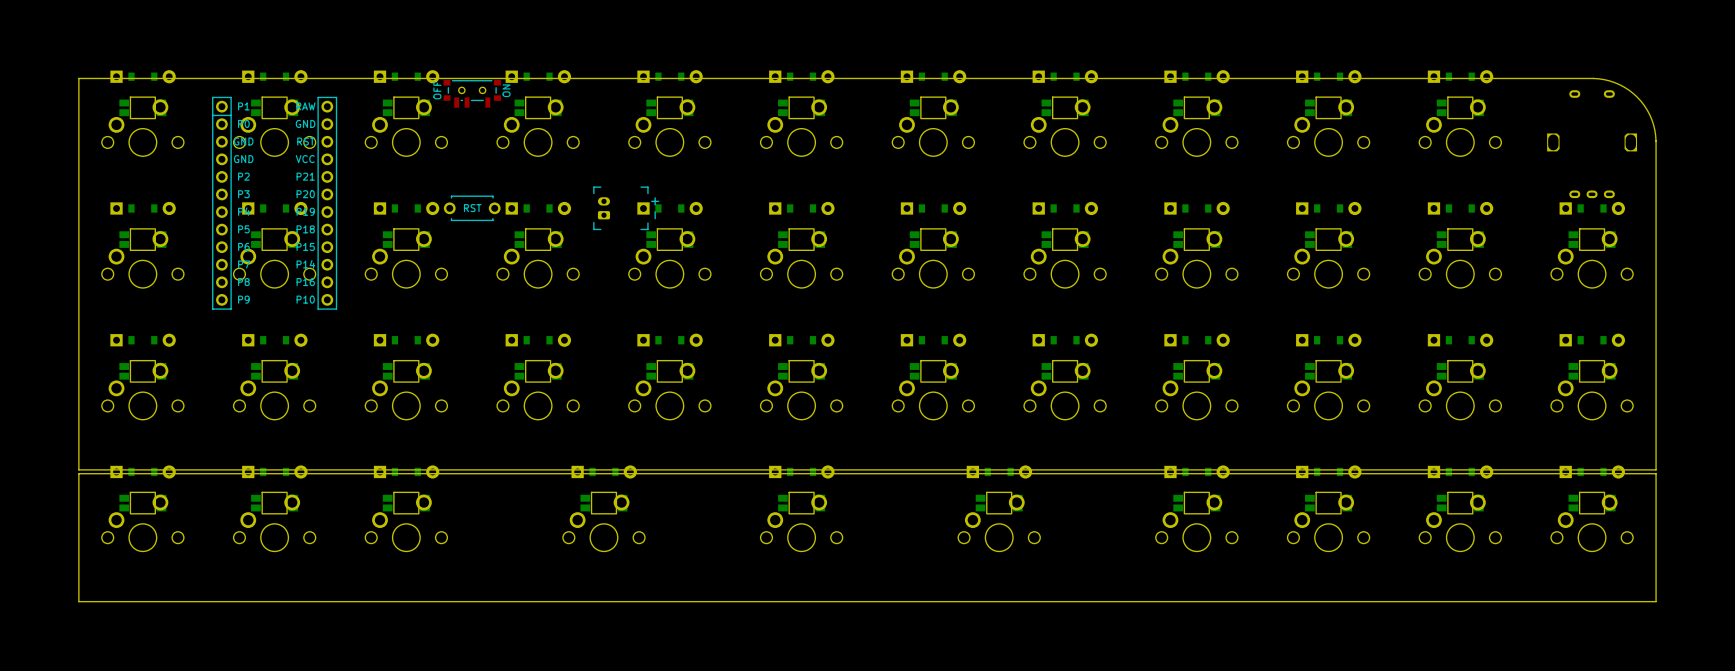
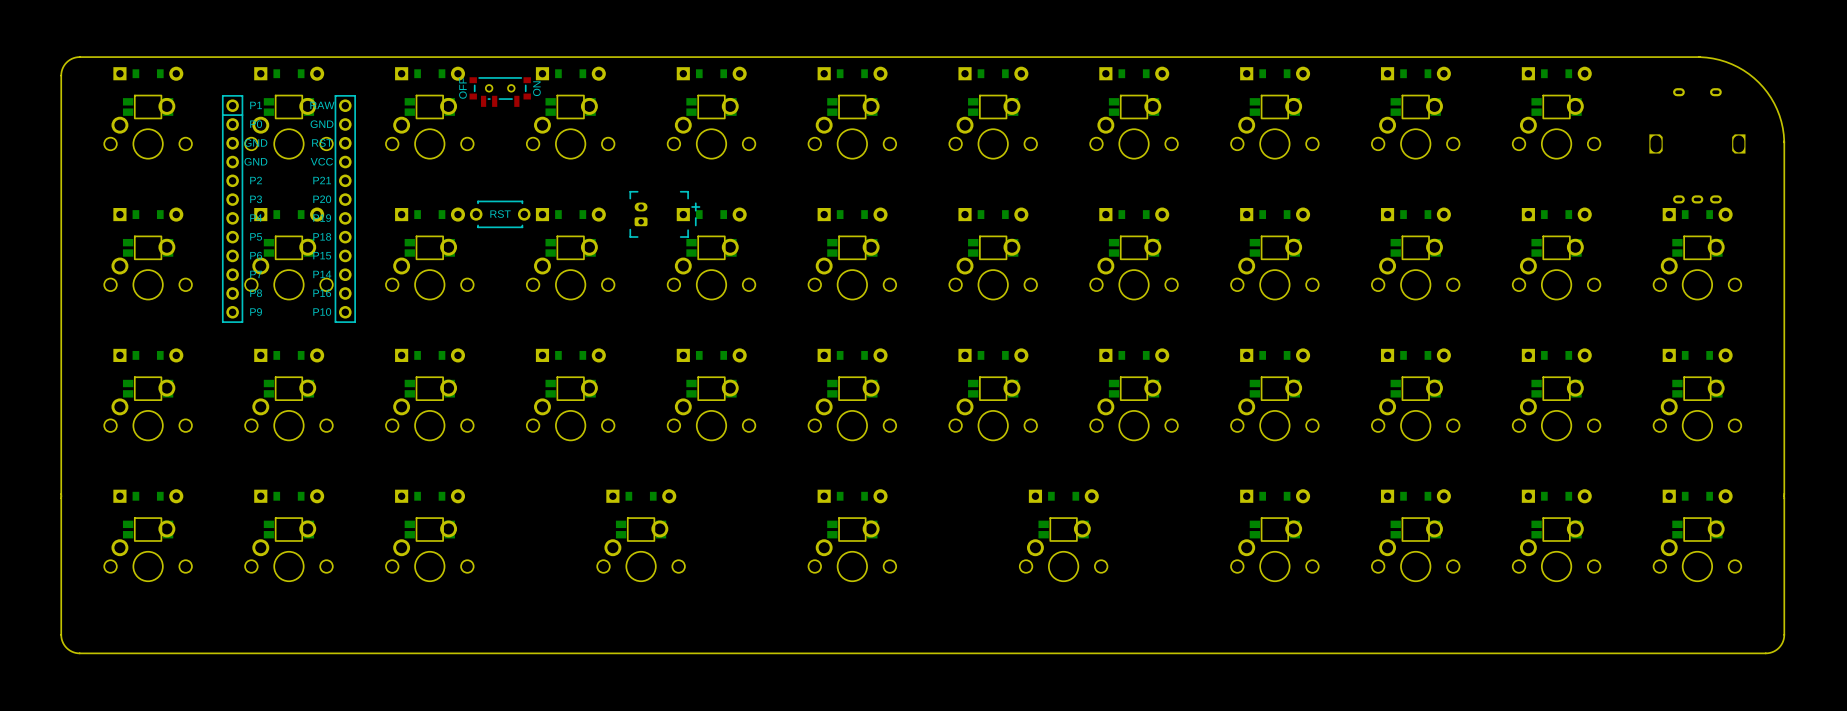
board edge: (78, 78) (1593, 78) (1609, 80) (1629, 90) (1640, 101) (1651, 119) (1655, 135) (1656, 469) (78, 469) (78, 78) -> none
board edge: none -> (61, 496) (61, 636) (66, 647) (79, 653) (1767, 653) (1778, 647) (1784, 636) (1784, 496)
board edge: none -> (61, 496) (61, 75) (66, 62) (79, 57) (1698, 57) (1719, 59) (1743, 70) (1758, 82) (1774, 103) (1782, 128) (1784, 496)
board edge: (78, 473) (78, 601) (1656, 601) (1656, 473) (78, 473) -> none

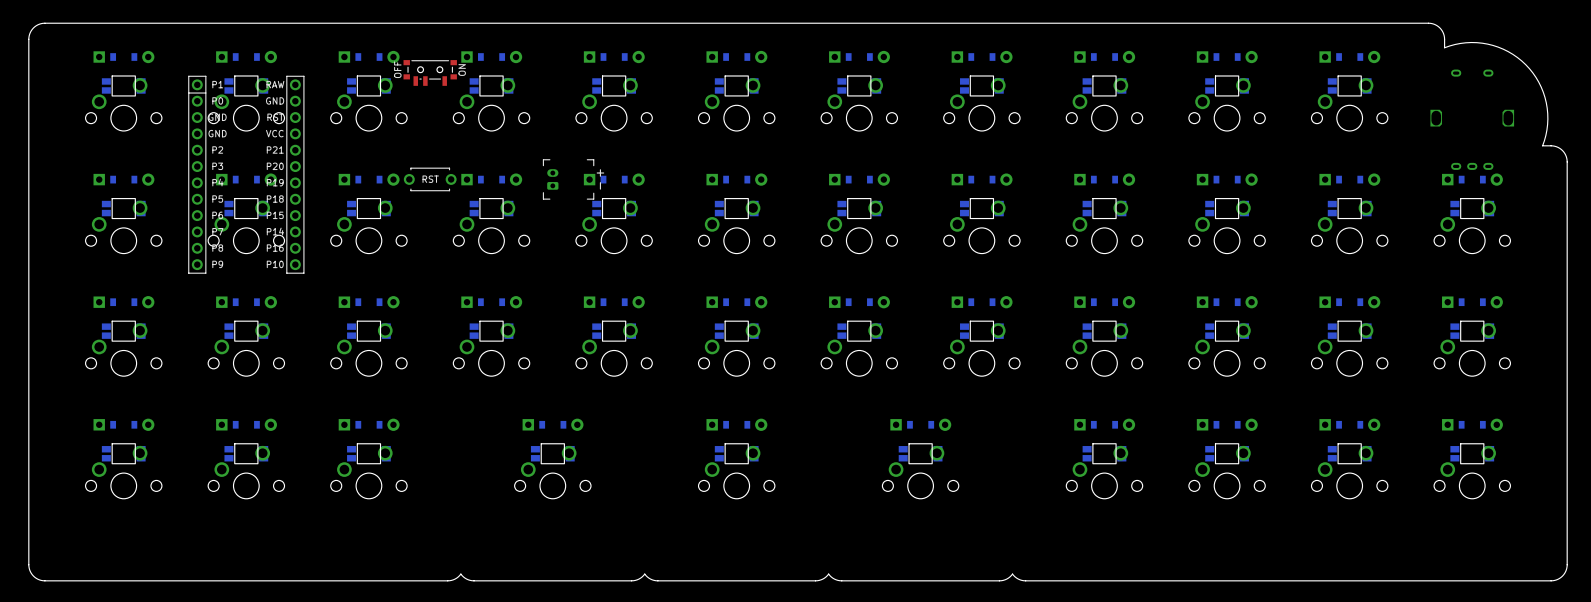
board edge: none -> (44, 23) (1428, 23) (1435, 24) (1442, 30) (1444, 47) (1471, 42) (1498, 47) (1517, 57) (1536, 77) (1543, 92) (1547, 108) (1546, 129) (1542, 145) (1559, 148) (1564, 153) (1567, 160) (1566, 570) (1561, 577) (1551, 580) (1025, 580) (1018, 579) (1012, 574) (1006, 579) (999, 580) (841, 580) (834, 579) (828, 574) (822, 579) (815, 580) (657, 580) (650, 579) (644, 574) (639, 579) (631, 580) (473, 580) (466, 579) (460, 574) (455, 579) (447, 580) (39, 579) (32, 574) (28, 564) (28, 39) (33, 27) (44, 23)
board edge: (61, 496) (61, 636) (66, 647) (79, 653) (1767, 653) (1778, 647) (1784, 636) (1784, 496) -> none
board edge: (61, 496) (61, 75) (66, 62) (79, 57) (1698, 57) (1719, 59) (1743, 70) (1758, 82) (1774, 103) (1782, 128) (1784, 496) -> none

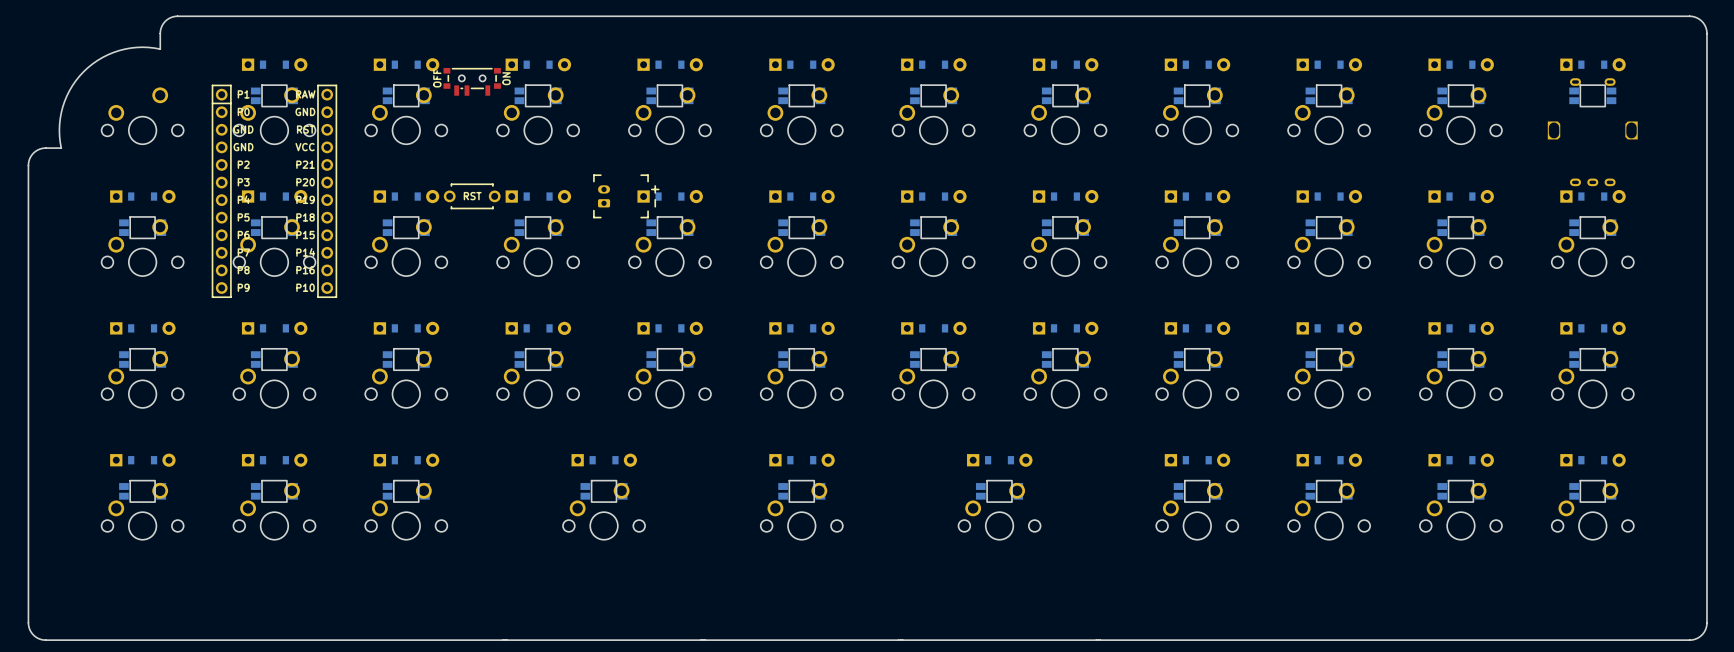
board edge: (44, 23) (1428, 23) (1435, 24) (1442, 30) (1444, 47) (1471, 42) (1498, 47) (1517, 57) (1536, 77) (1543, 92) (1547, 108) (1546, 129) (1542, 145) (1559, 148) (1564, 153) (1567, 160) (1566, 570) (1561, 577) (1551, 580) (1025, 580) (1018, 579) (1012, 574) (1006, 579) (999, 580) (841, 580) (834, 579) (828, 574) (822, 579) (815, 580) (657, 580) (650, 579) (644, 574) (639, 579) (631, 580) (473, 580) (466, 579) (460, 574) (455, 579) (447, 580) (39, 579) (32, 574) (28, 564) (28, 39) (33, 27) (44, 23) -> (177, 16) (168, 18) (161, 26) (160, 49) (142, 47) (119, 50) (102, 57) (83, 71) (69, 90) (62, 106) (59, 130) (61, 148) (38, 149) (32, 154) (28, 161) (28, 622) (31, 632) (40, 639) (1689, 640) (1698, 637) (1706, 628) (1706, 33) (1704, 24) (1695, 17) (177, 16)
part: (123, 57) -> none
part: none -> (1593, 64)
part: (123, 85) -> none
part: none -> (1592, 95)

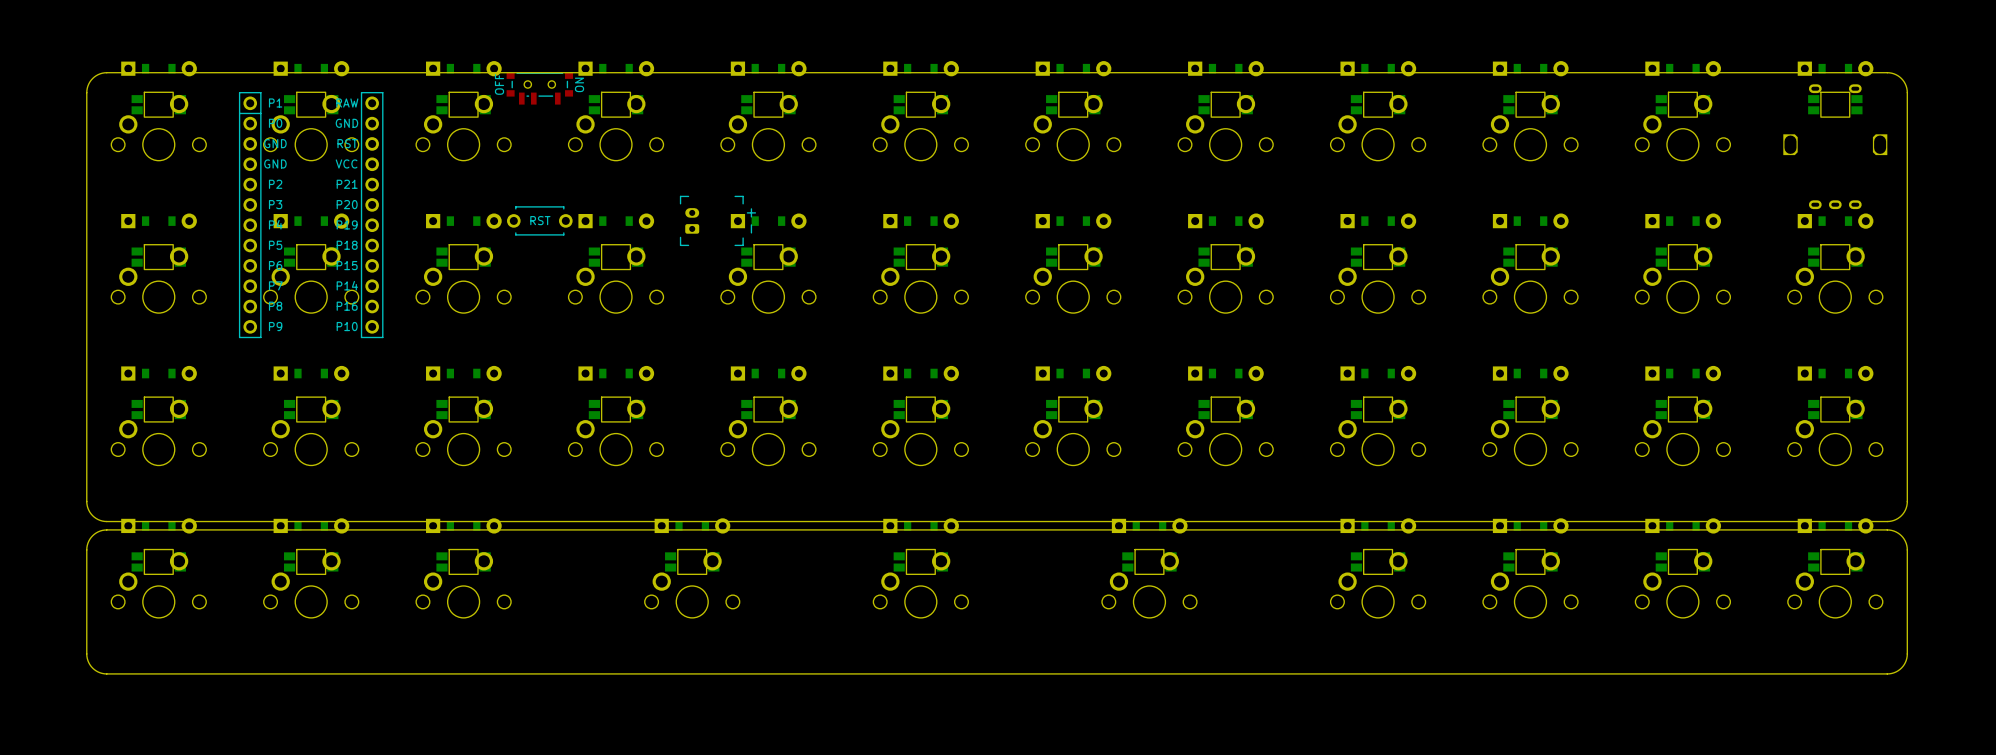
board edge: (177, 16) (1695, 17) (1704, 24) (1706, 33) (1706, 628) (1698, 637) (1689, 640) (40, 639) (31, 632) (28, 622) (28, 161) (32, 154) (38, 149) (61, 148) (59, 130) (62, 106) (69, 90) (83, 71) (102, 57) (119, 50) (142, 47) (160, 49) (161, 26) (168, 18) (177, 16) -> (106, 72) (92, 78) (86, 92) (86, 501) (91, 514) (102, 521) (1887, 521) (1899, 517) (1906, 505) (1907, 92) (1902, 80) (1891, 73) (106, 72)
part: none -> (159, 68)
part: none -> (158, 104)
board edge: none -> (106, 529) (1889, 530) (1901, 535) (1907, 547) (1907, 656) (1899, 669) (1887, 673) (104, 673) (92, 668) (86, 656) (86, 549) (92, 535) (106, 529)

